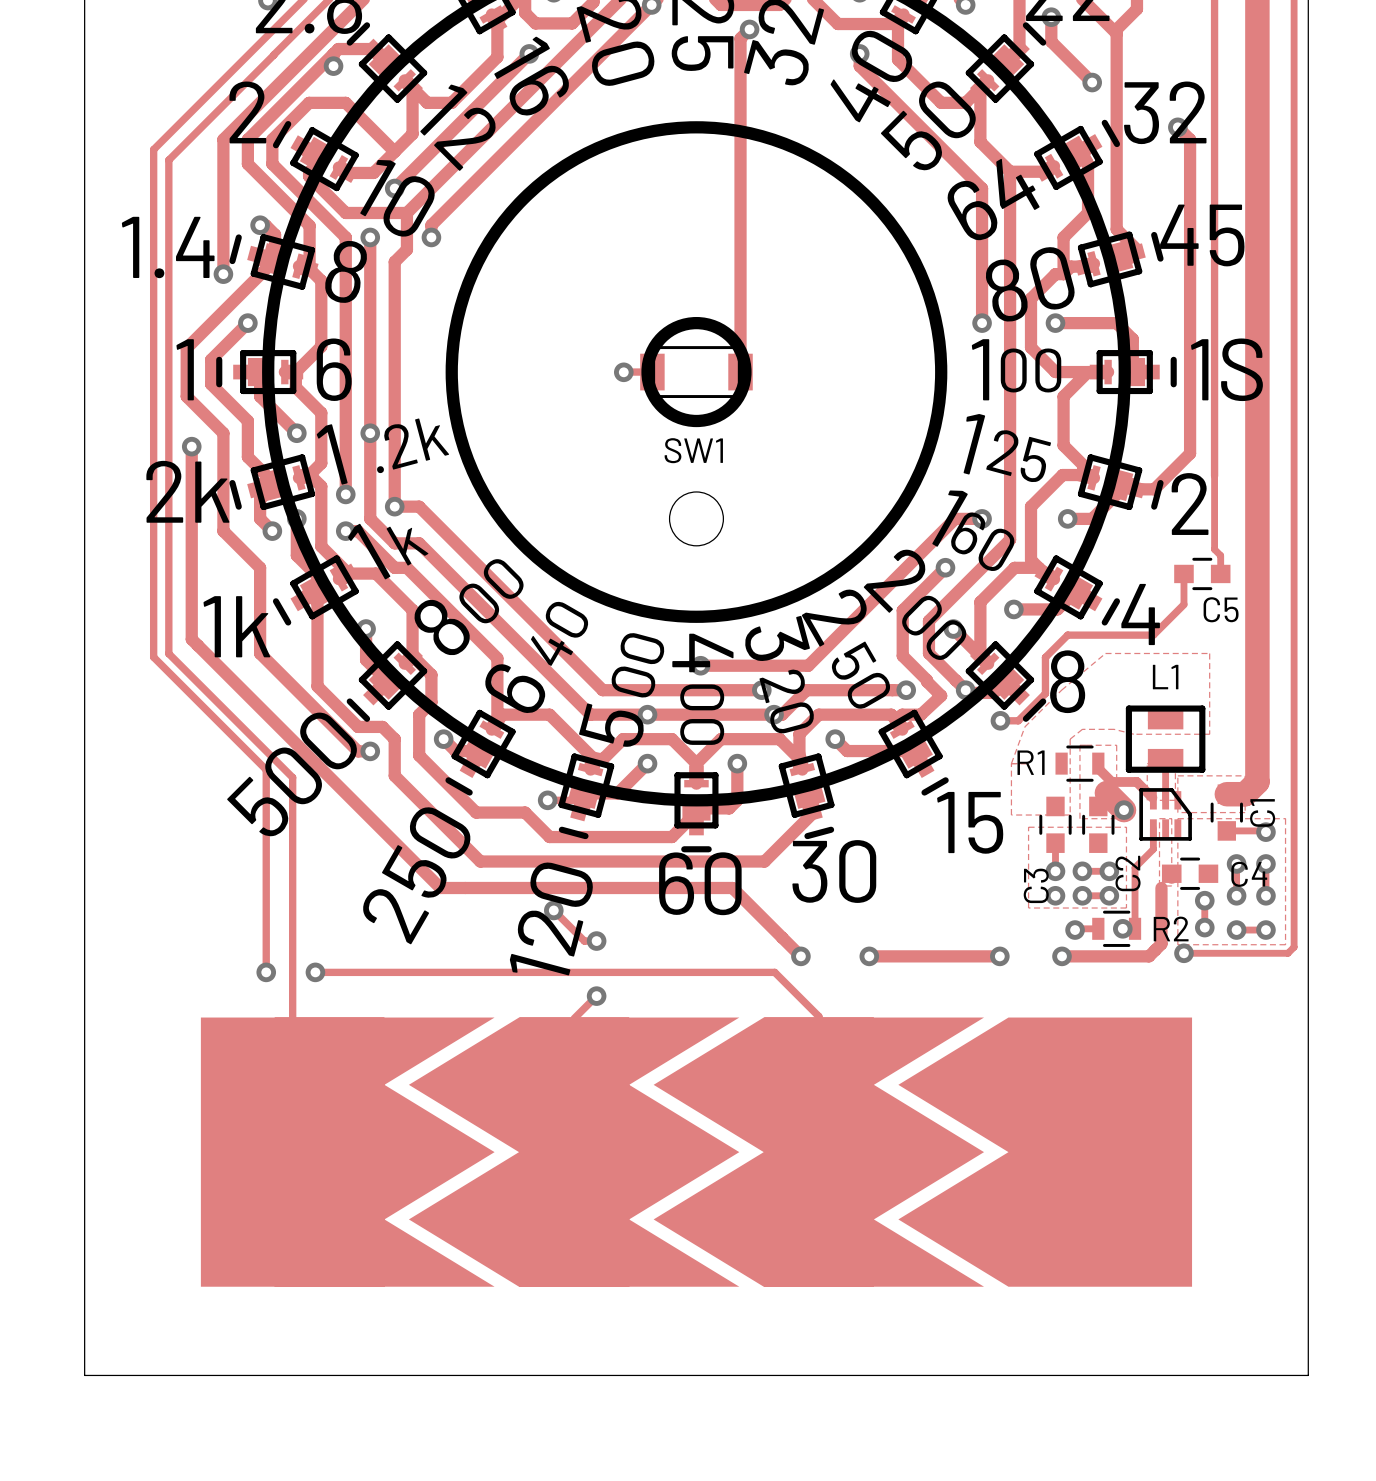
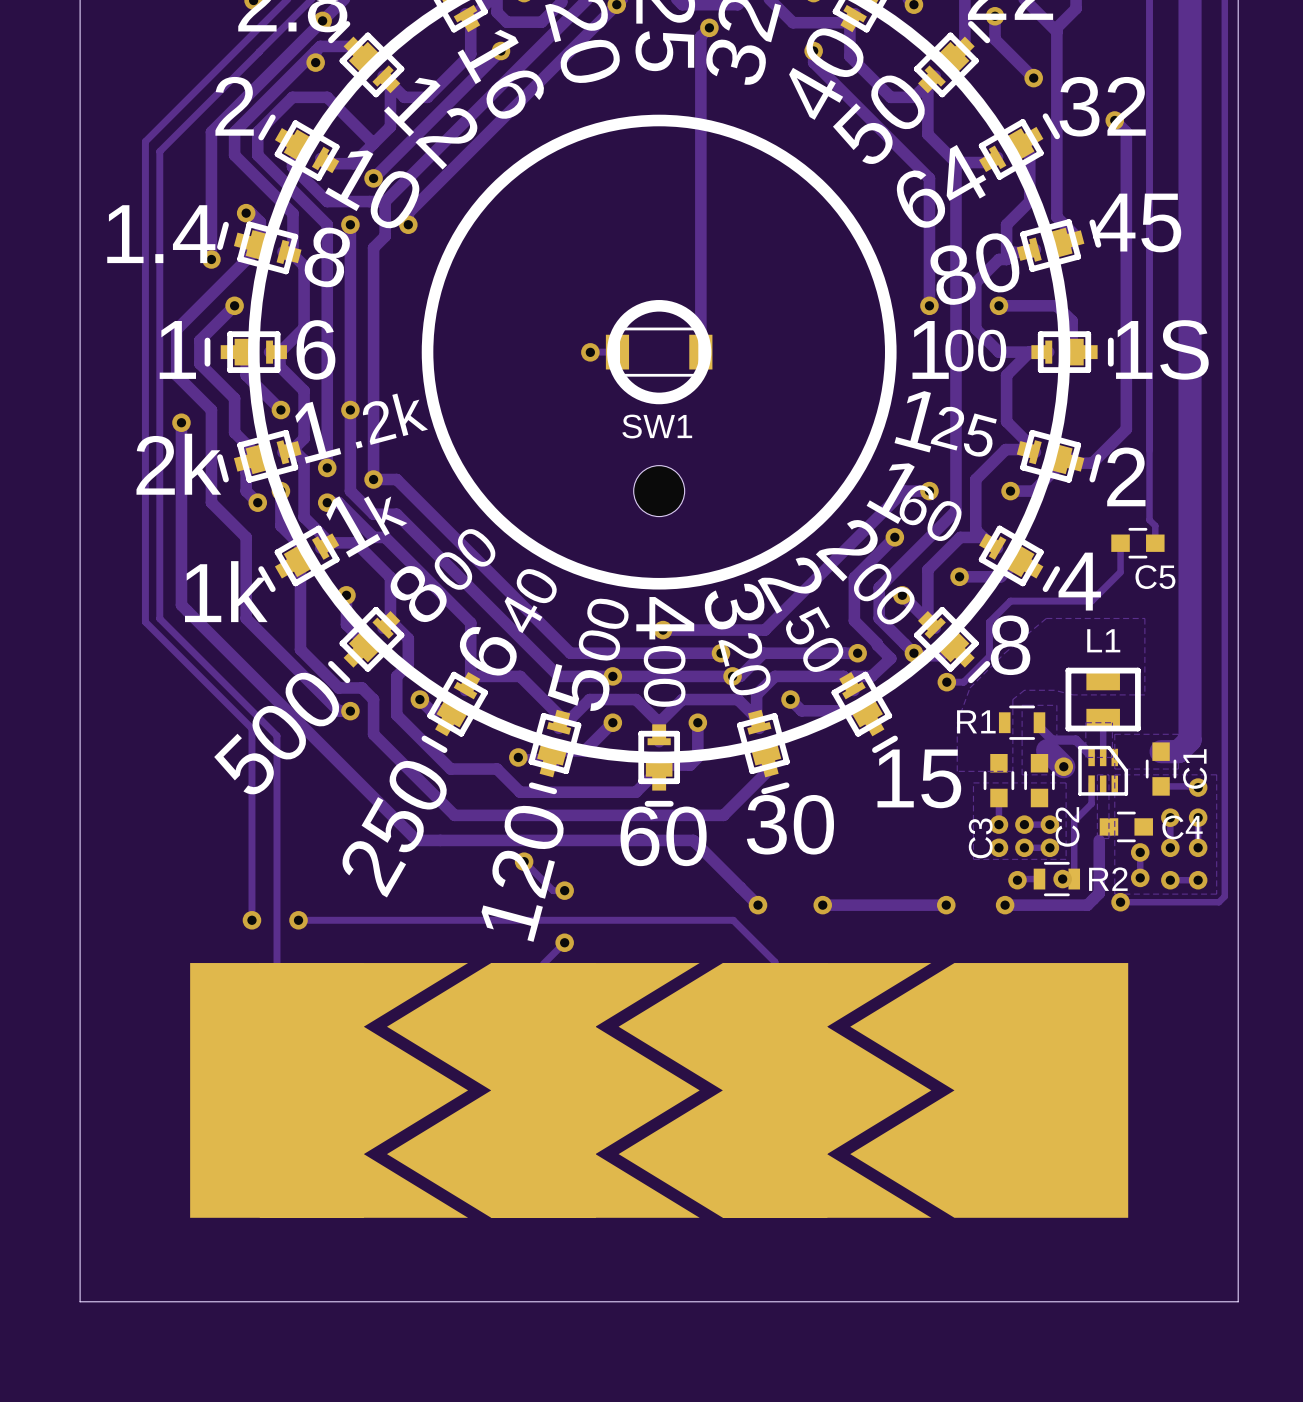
via: none -> (322, 20)

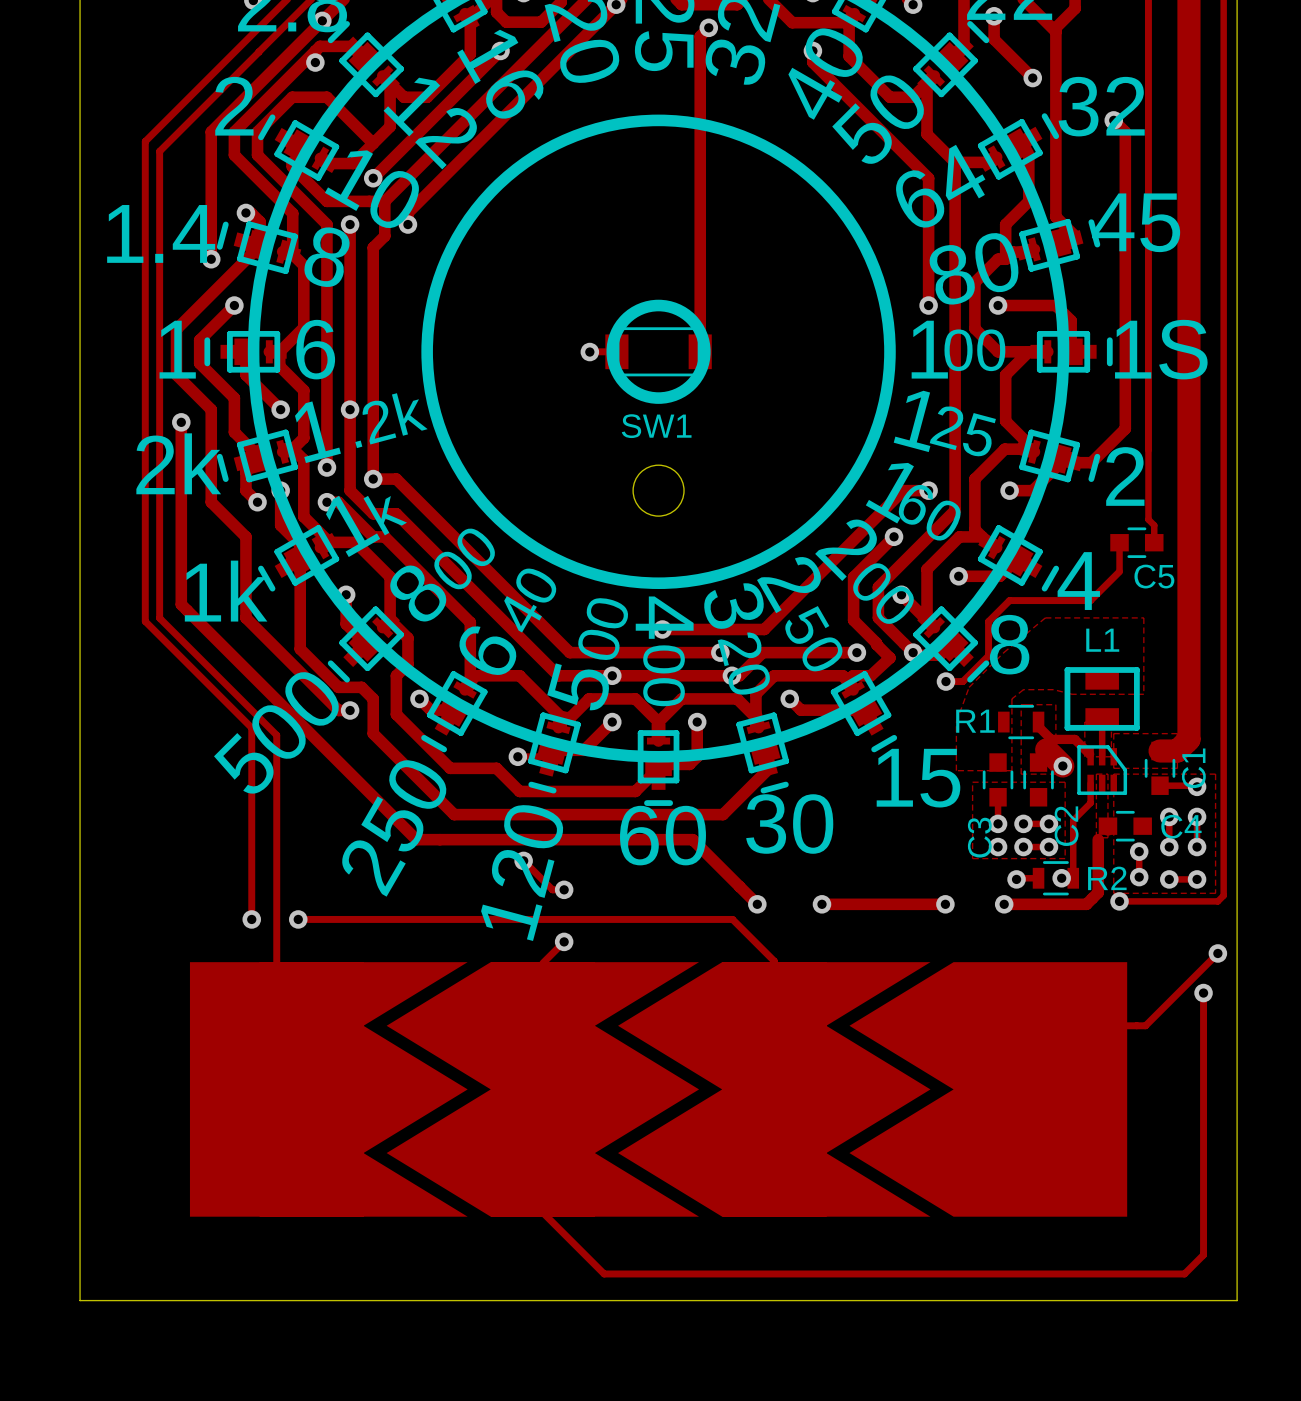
track: none -> (1217, 953) (1145, 1025) (1040, 1025)
via: none -> (1217, 953)
track: none -> (1203, 993) (1203, 1255) (1184, 1273) (604, 1273) (542, 1212) (542, 1153)
via: none -> (1203, 993)

